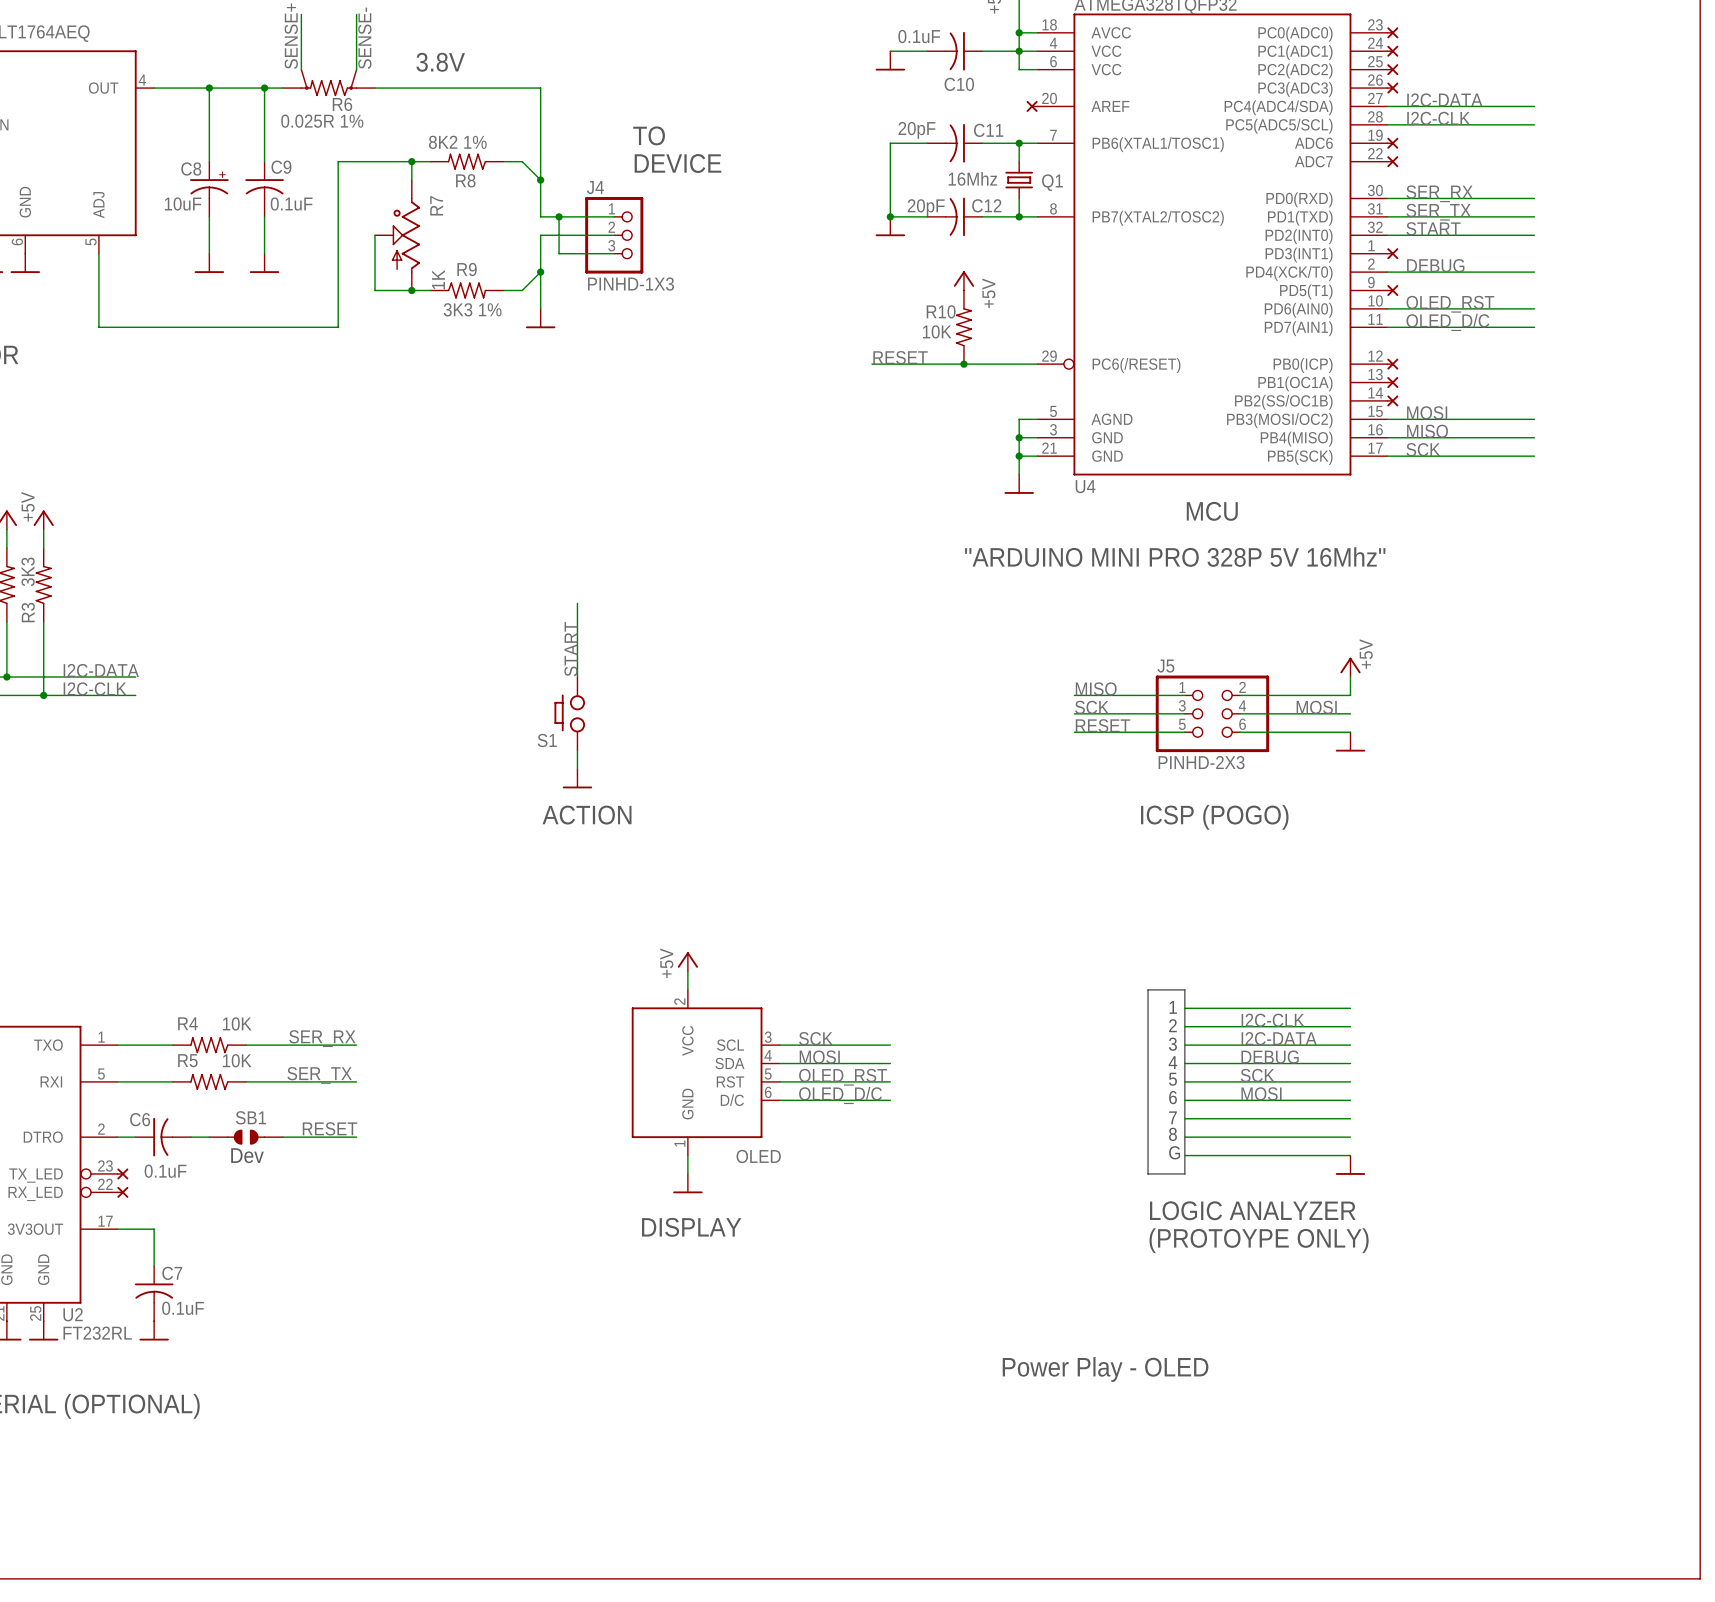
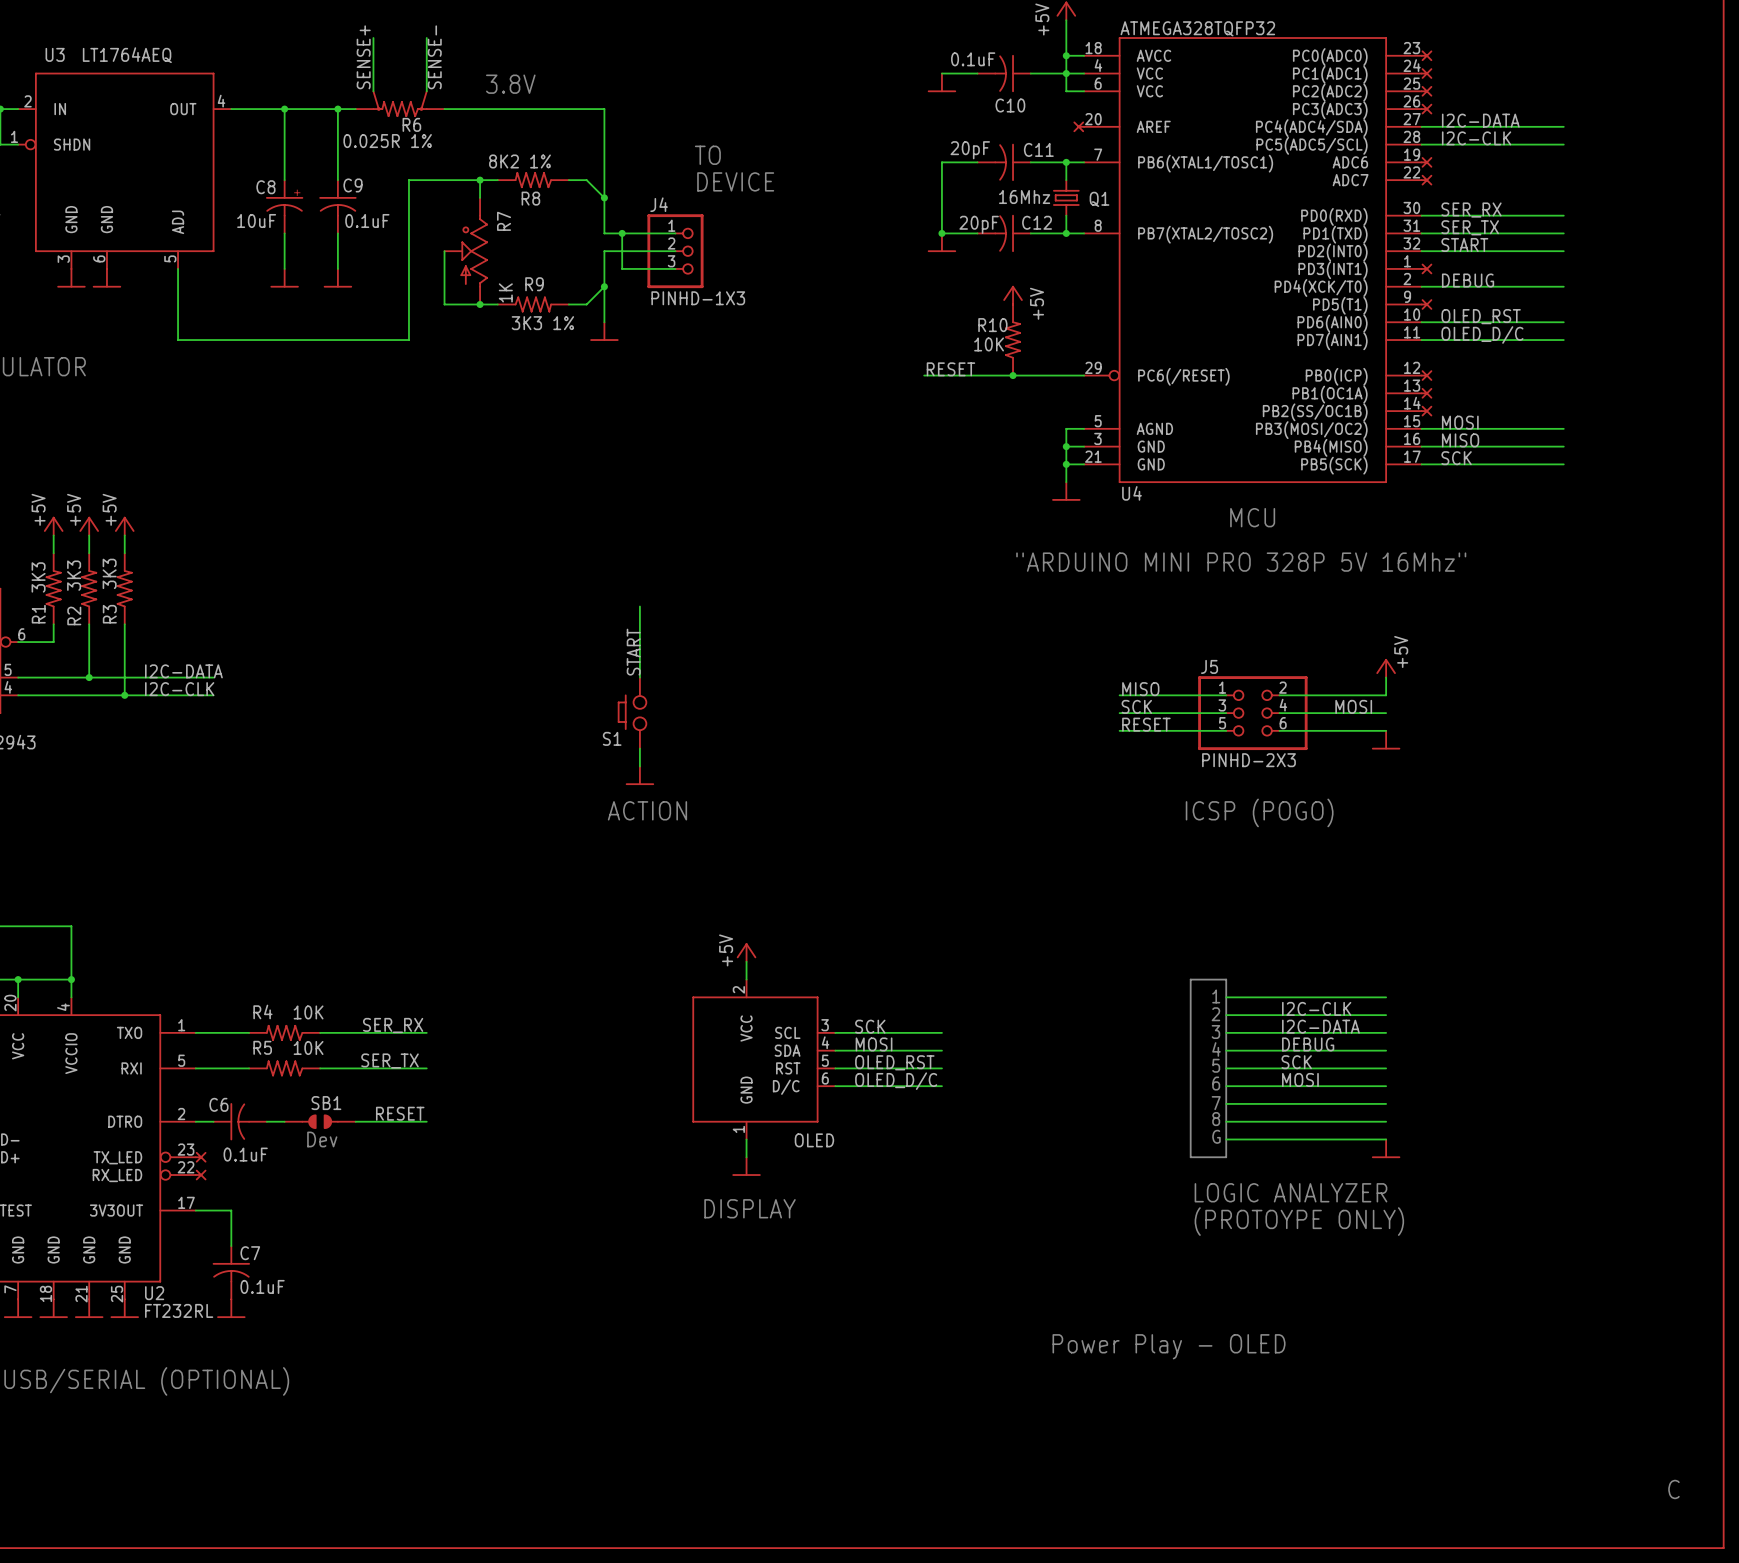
text: none -> C (1673, 1489)

